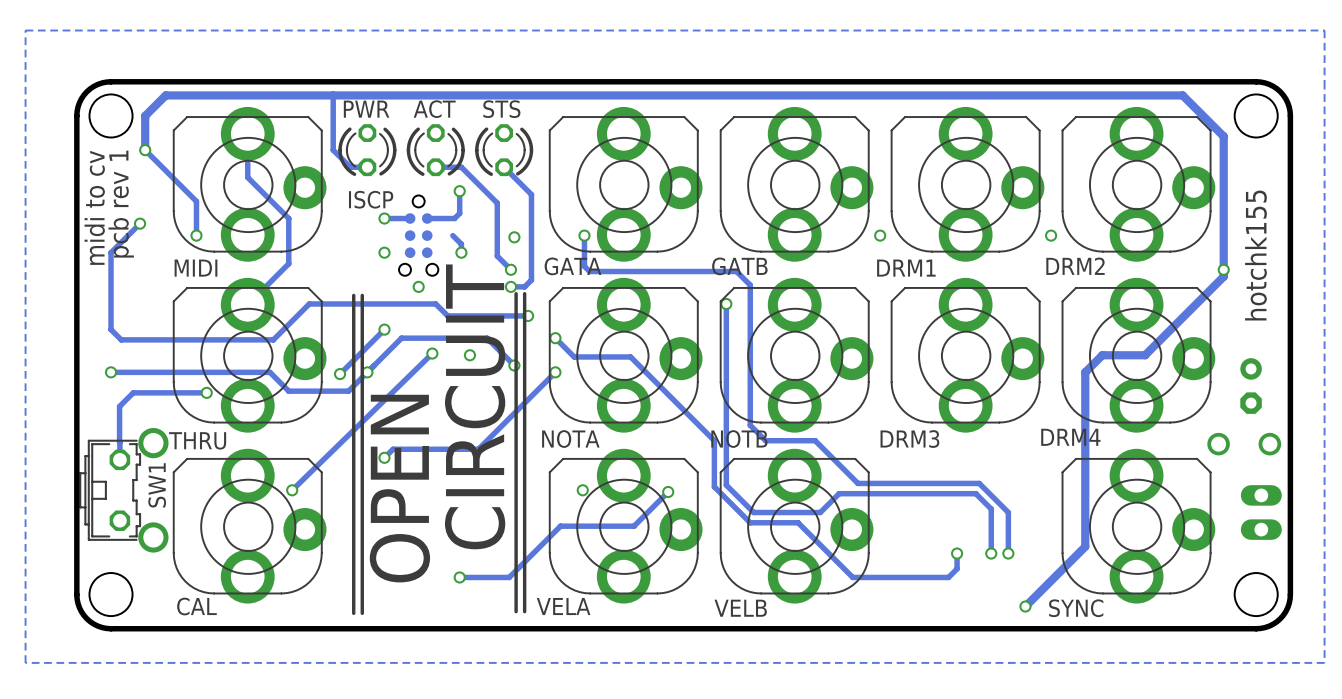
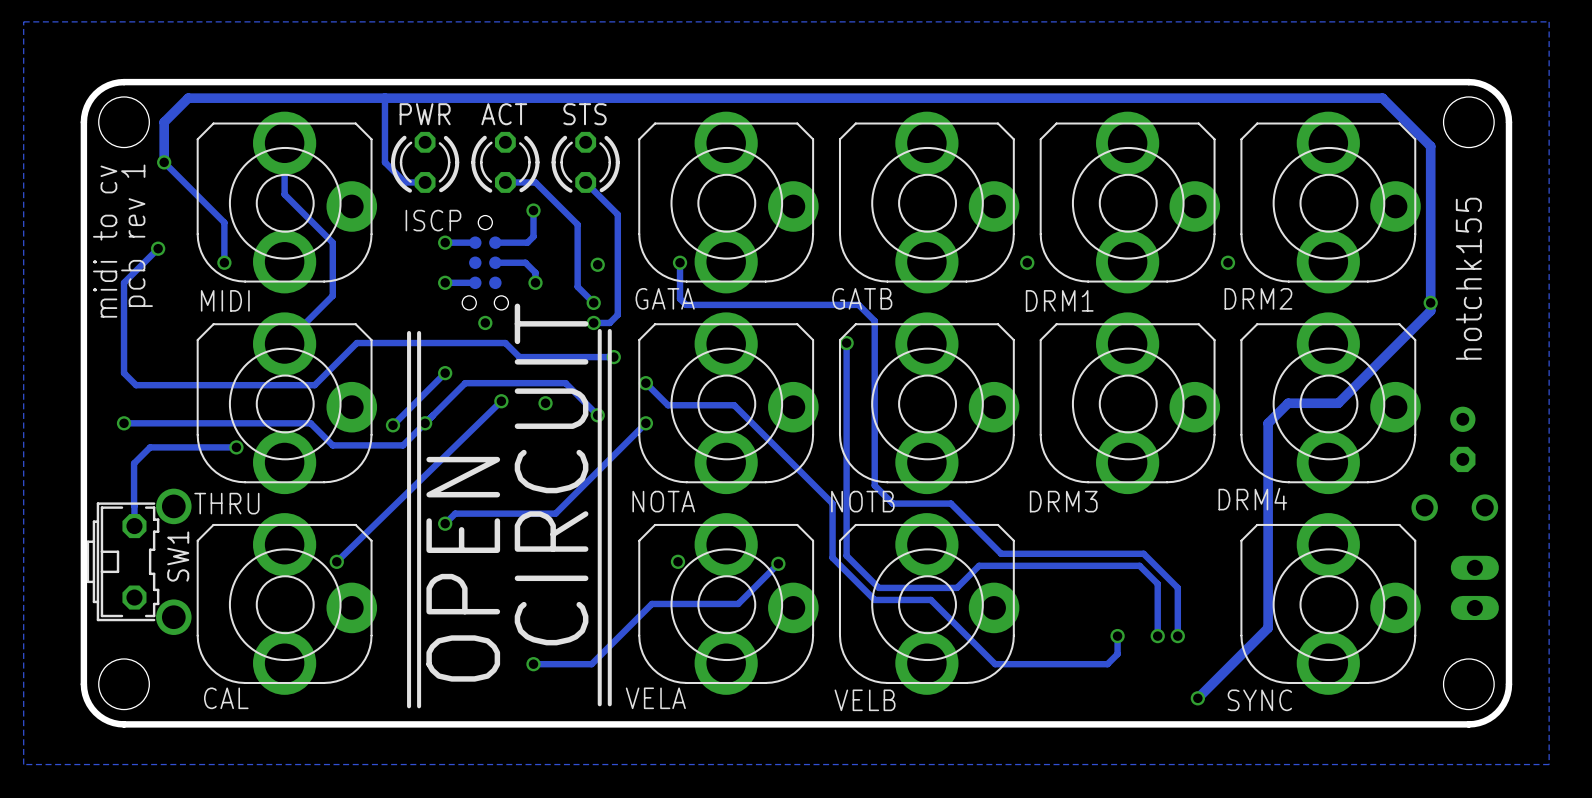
track: none -> (525, 262) (495, 262)
track: none -> (475, 282) (445, 282)

